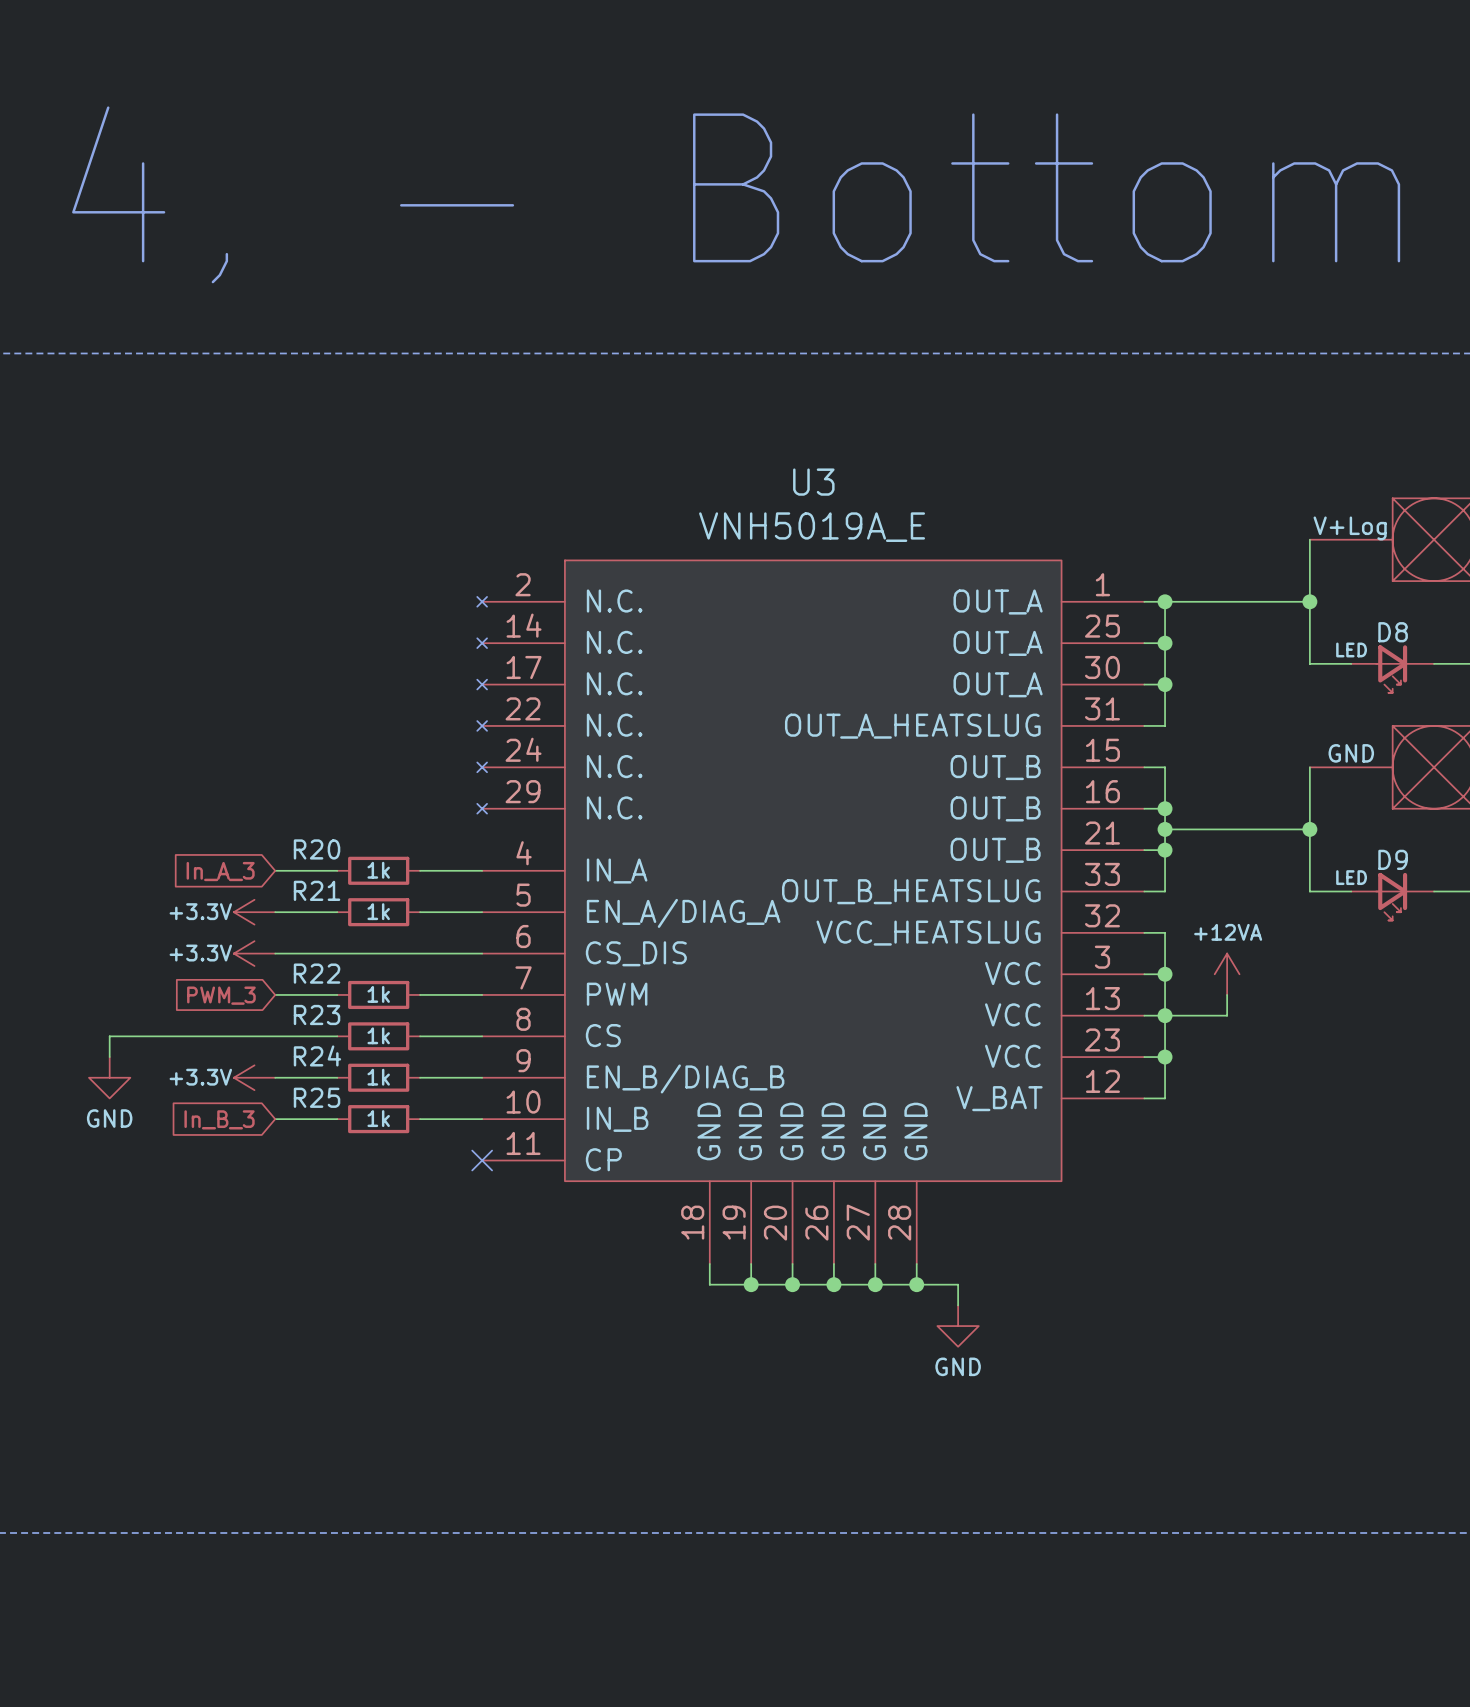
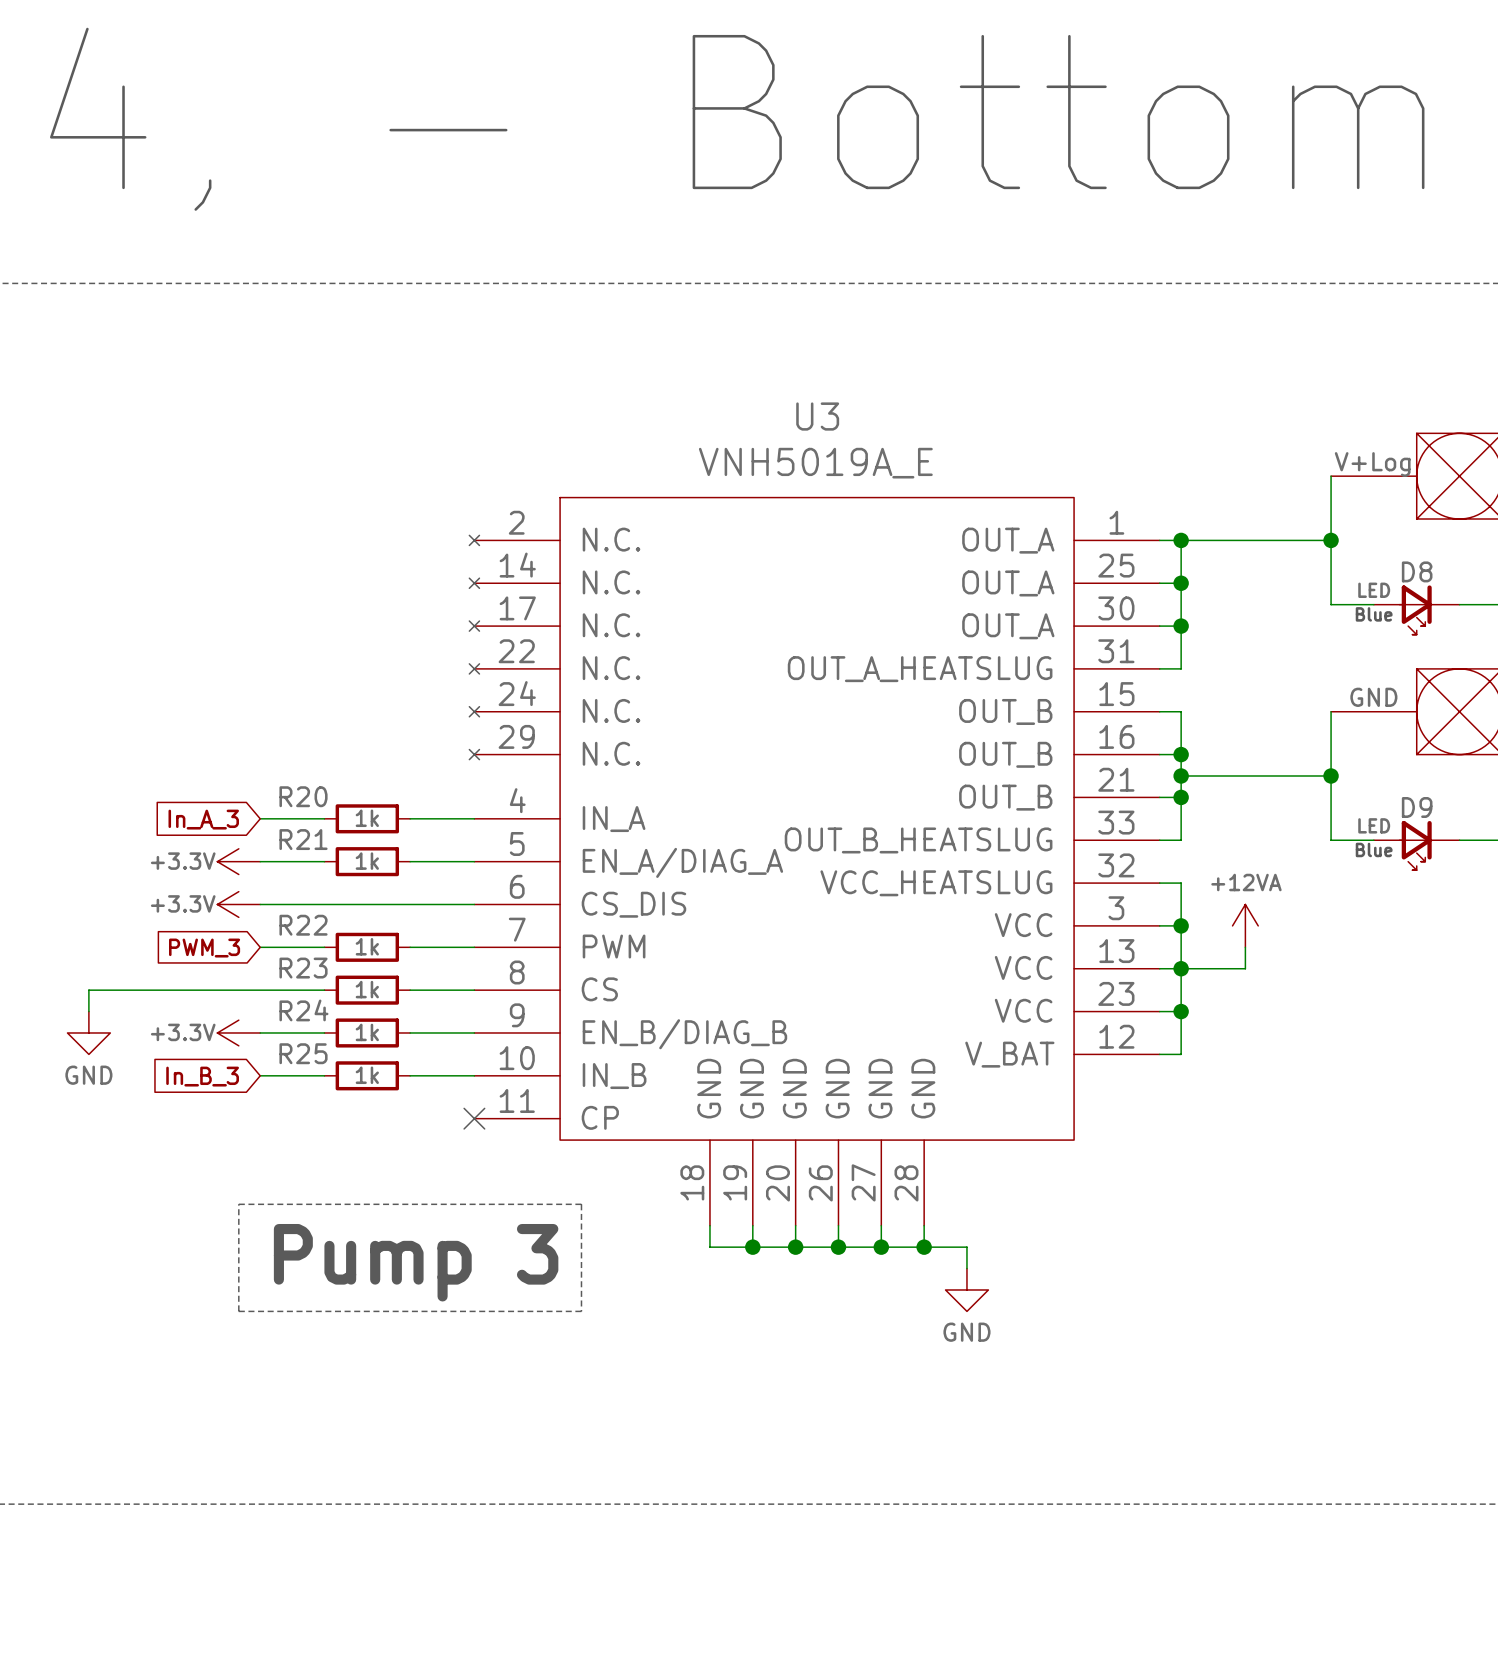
text: none -> Blue (1374, 614)
text: none -> Blue (1374, 849)
line: none -> (238, 1204) (238, 1311) (581, 1311) (581, 1204) (238, 1204)
text: none -> Pump 3 (416, 1262)

